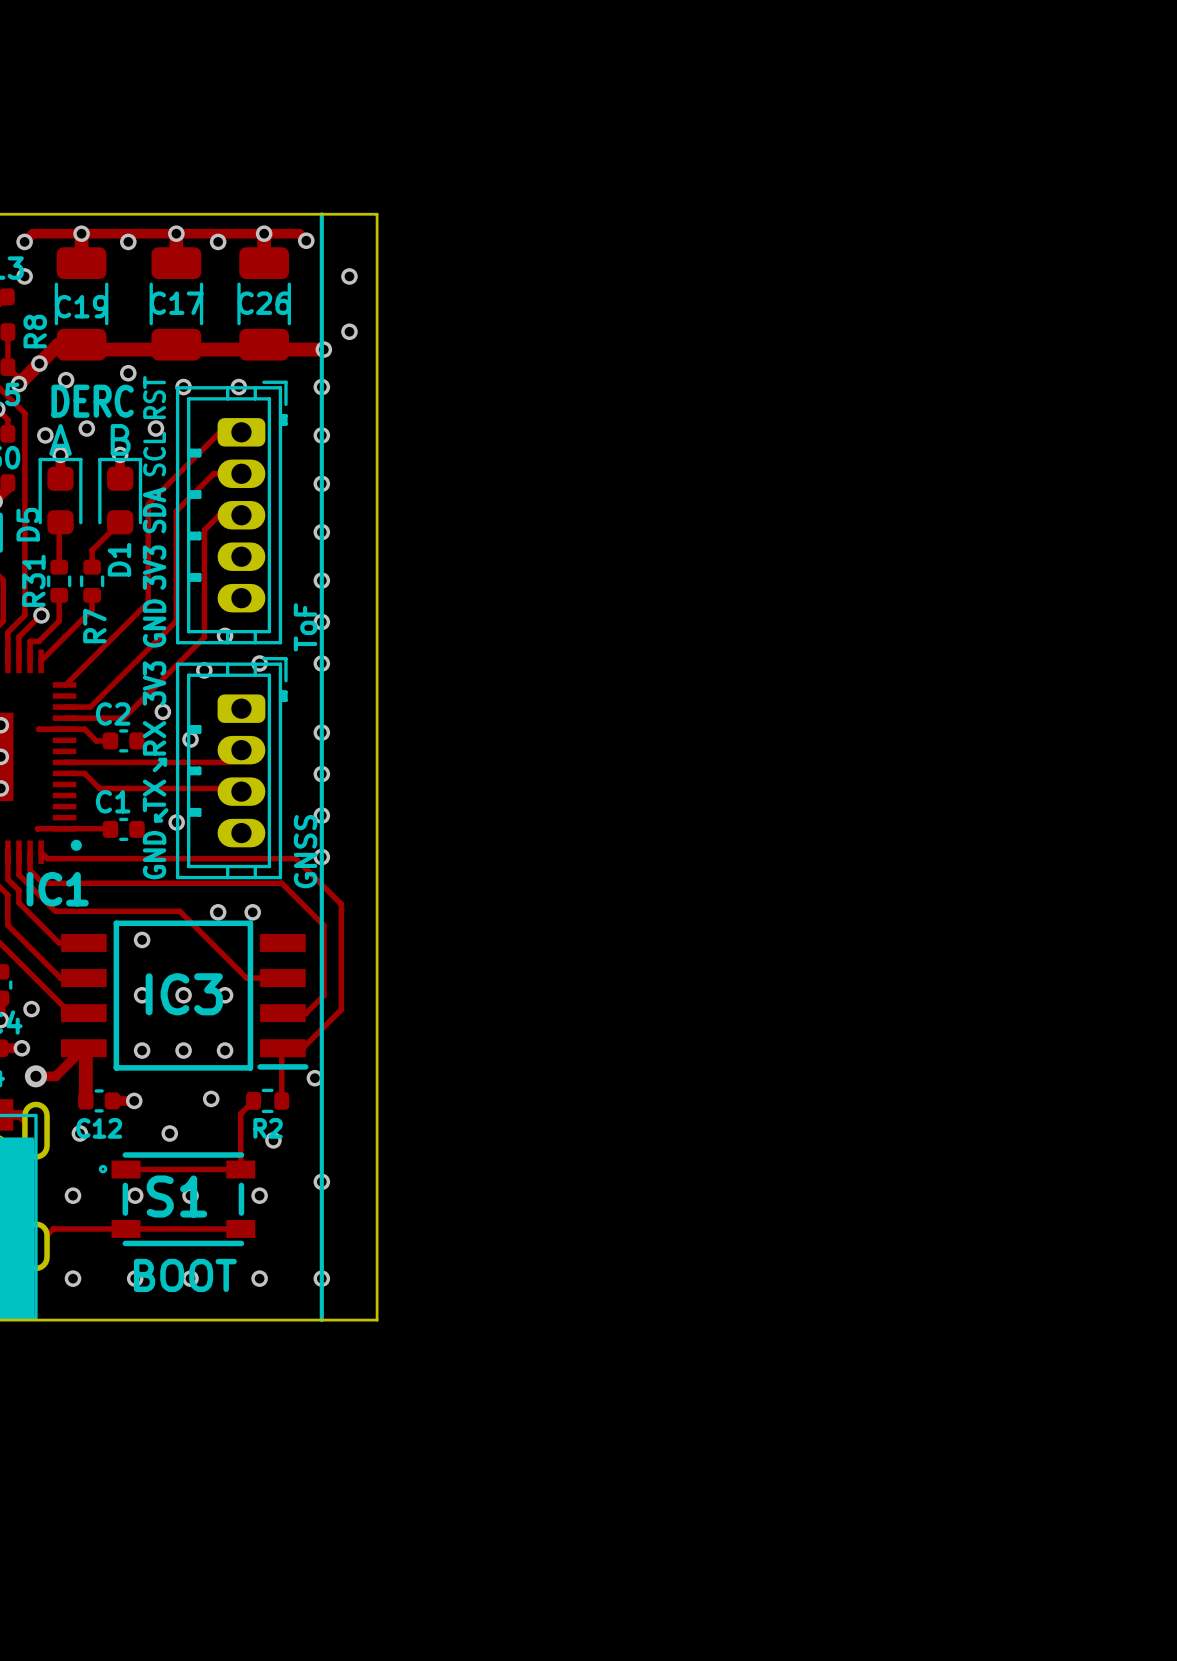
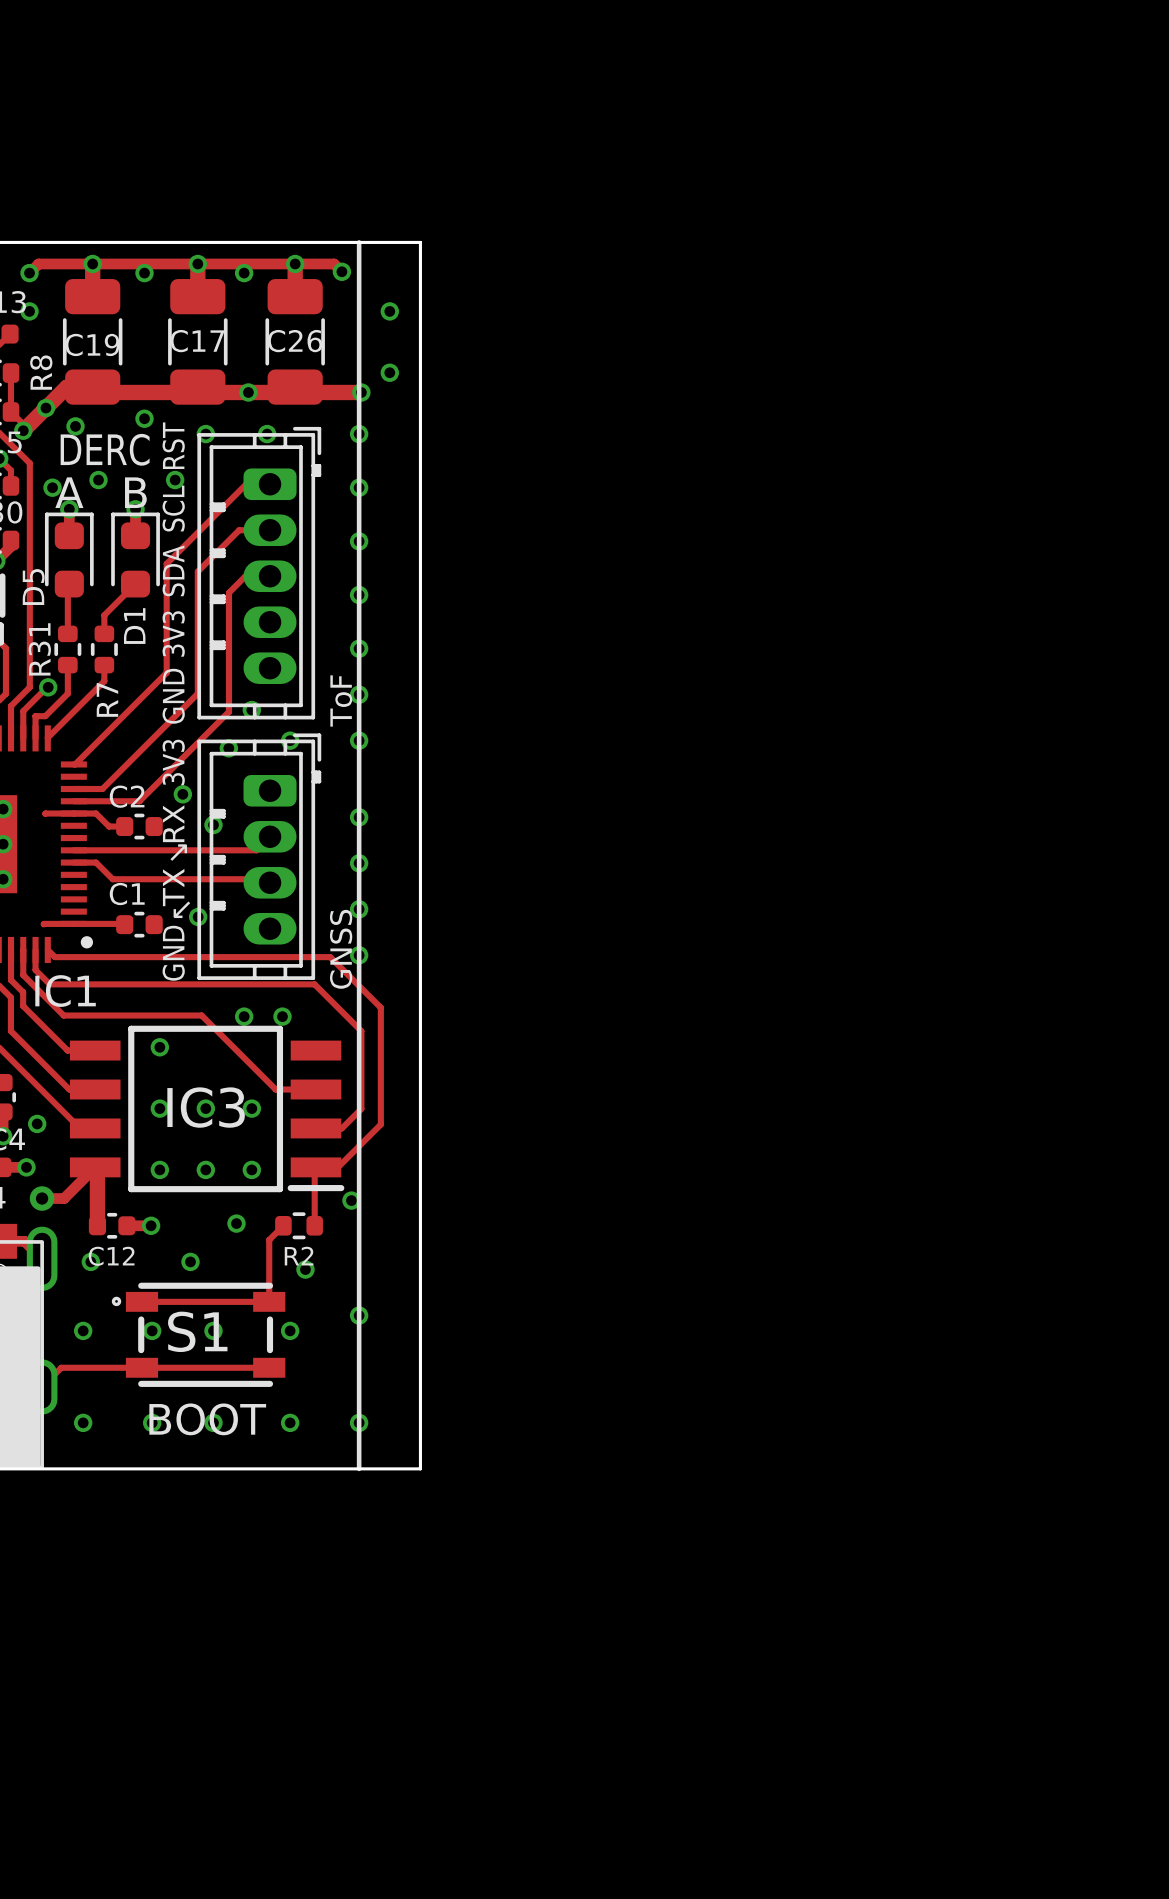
via: none -> (248, 392)

